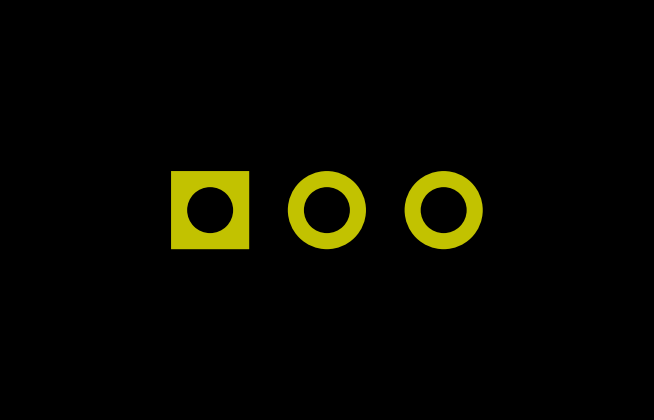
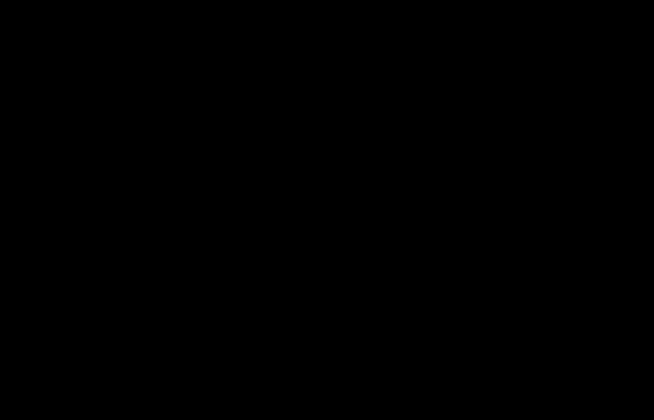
part: (326, 210) -> none

